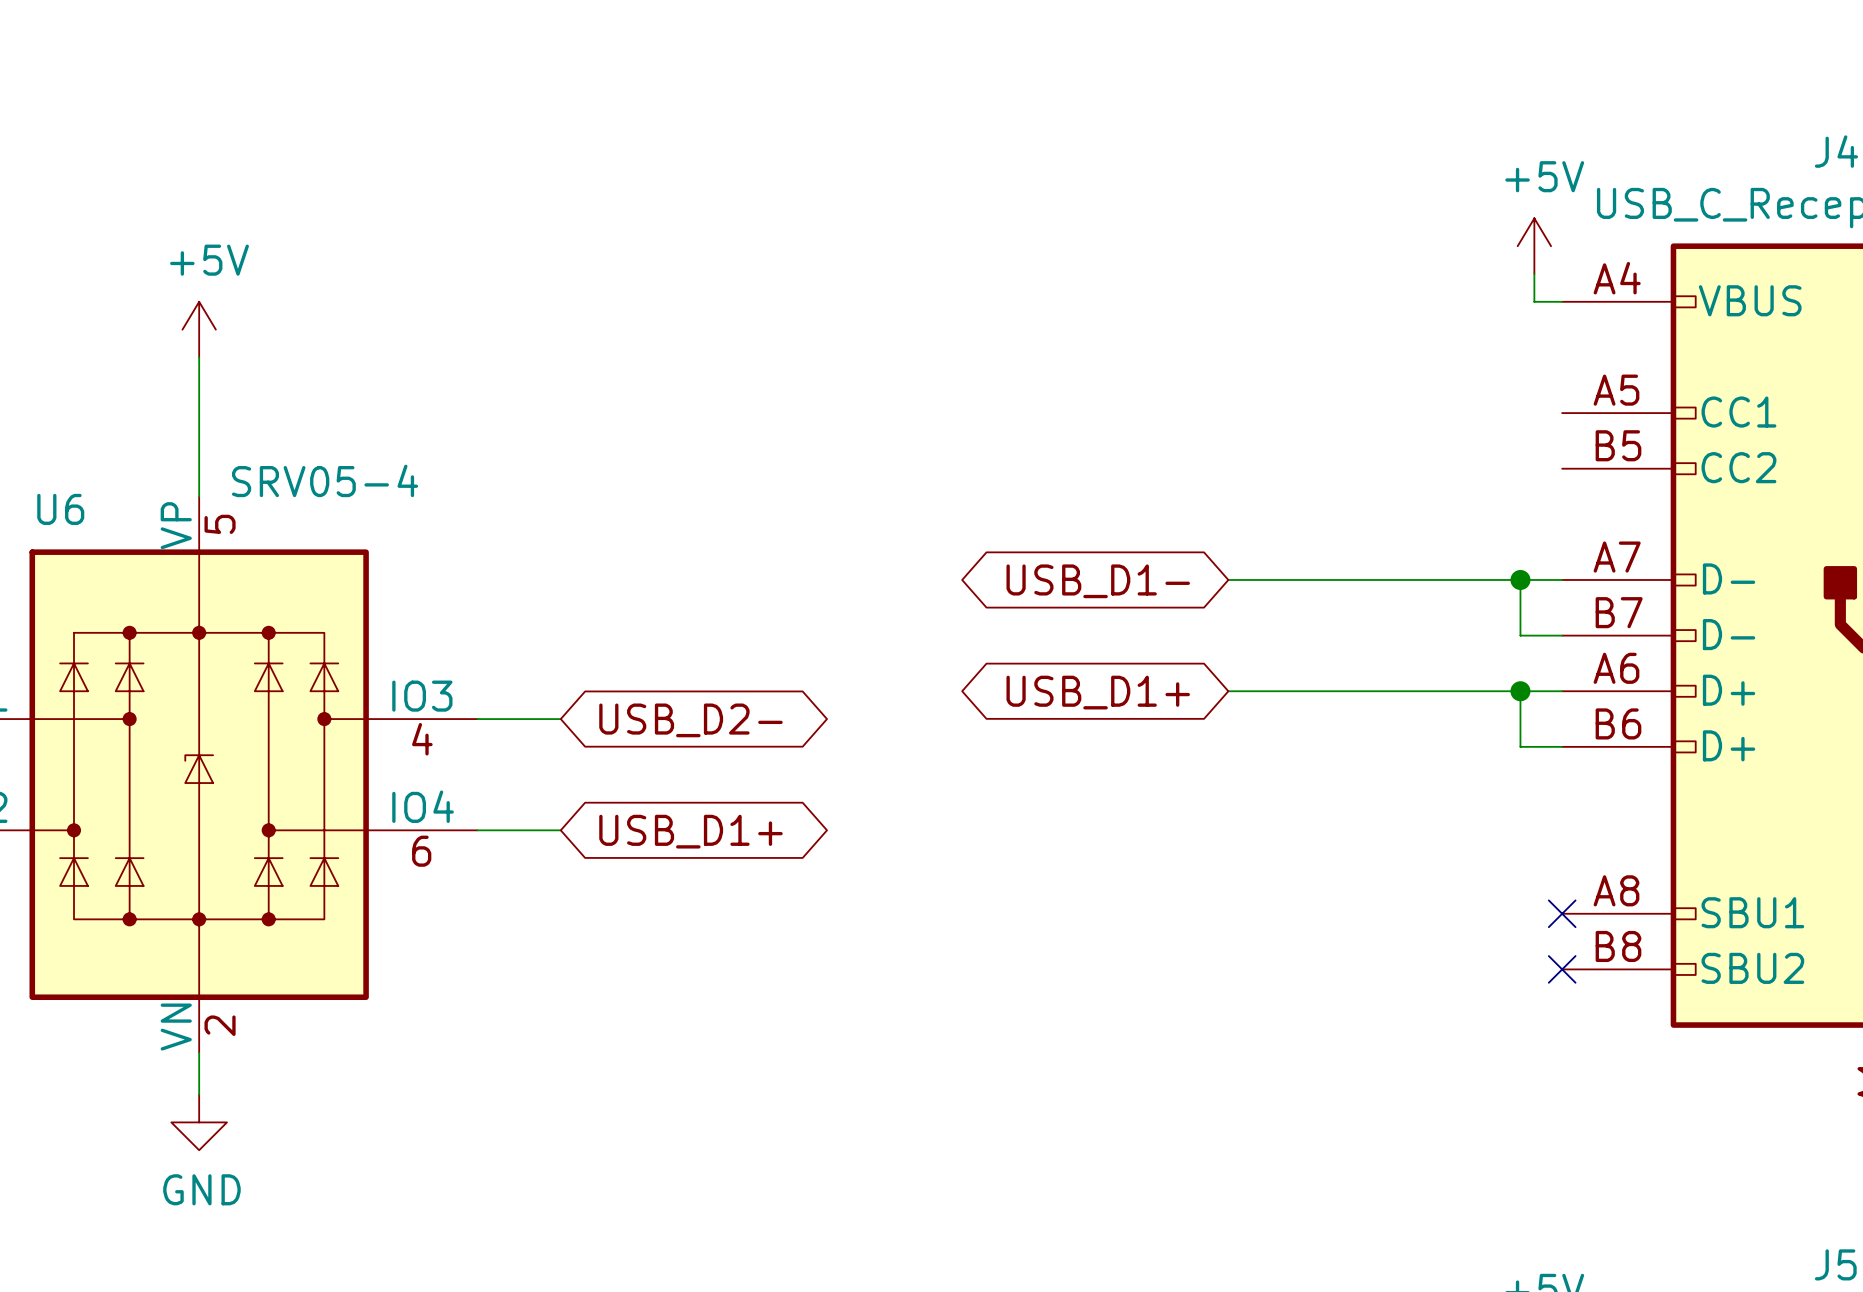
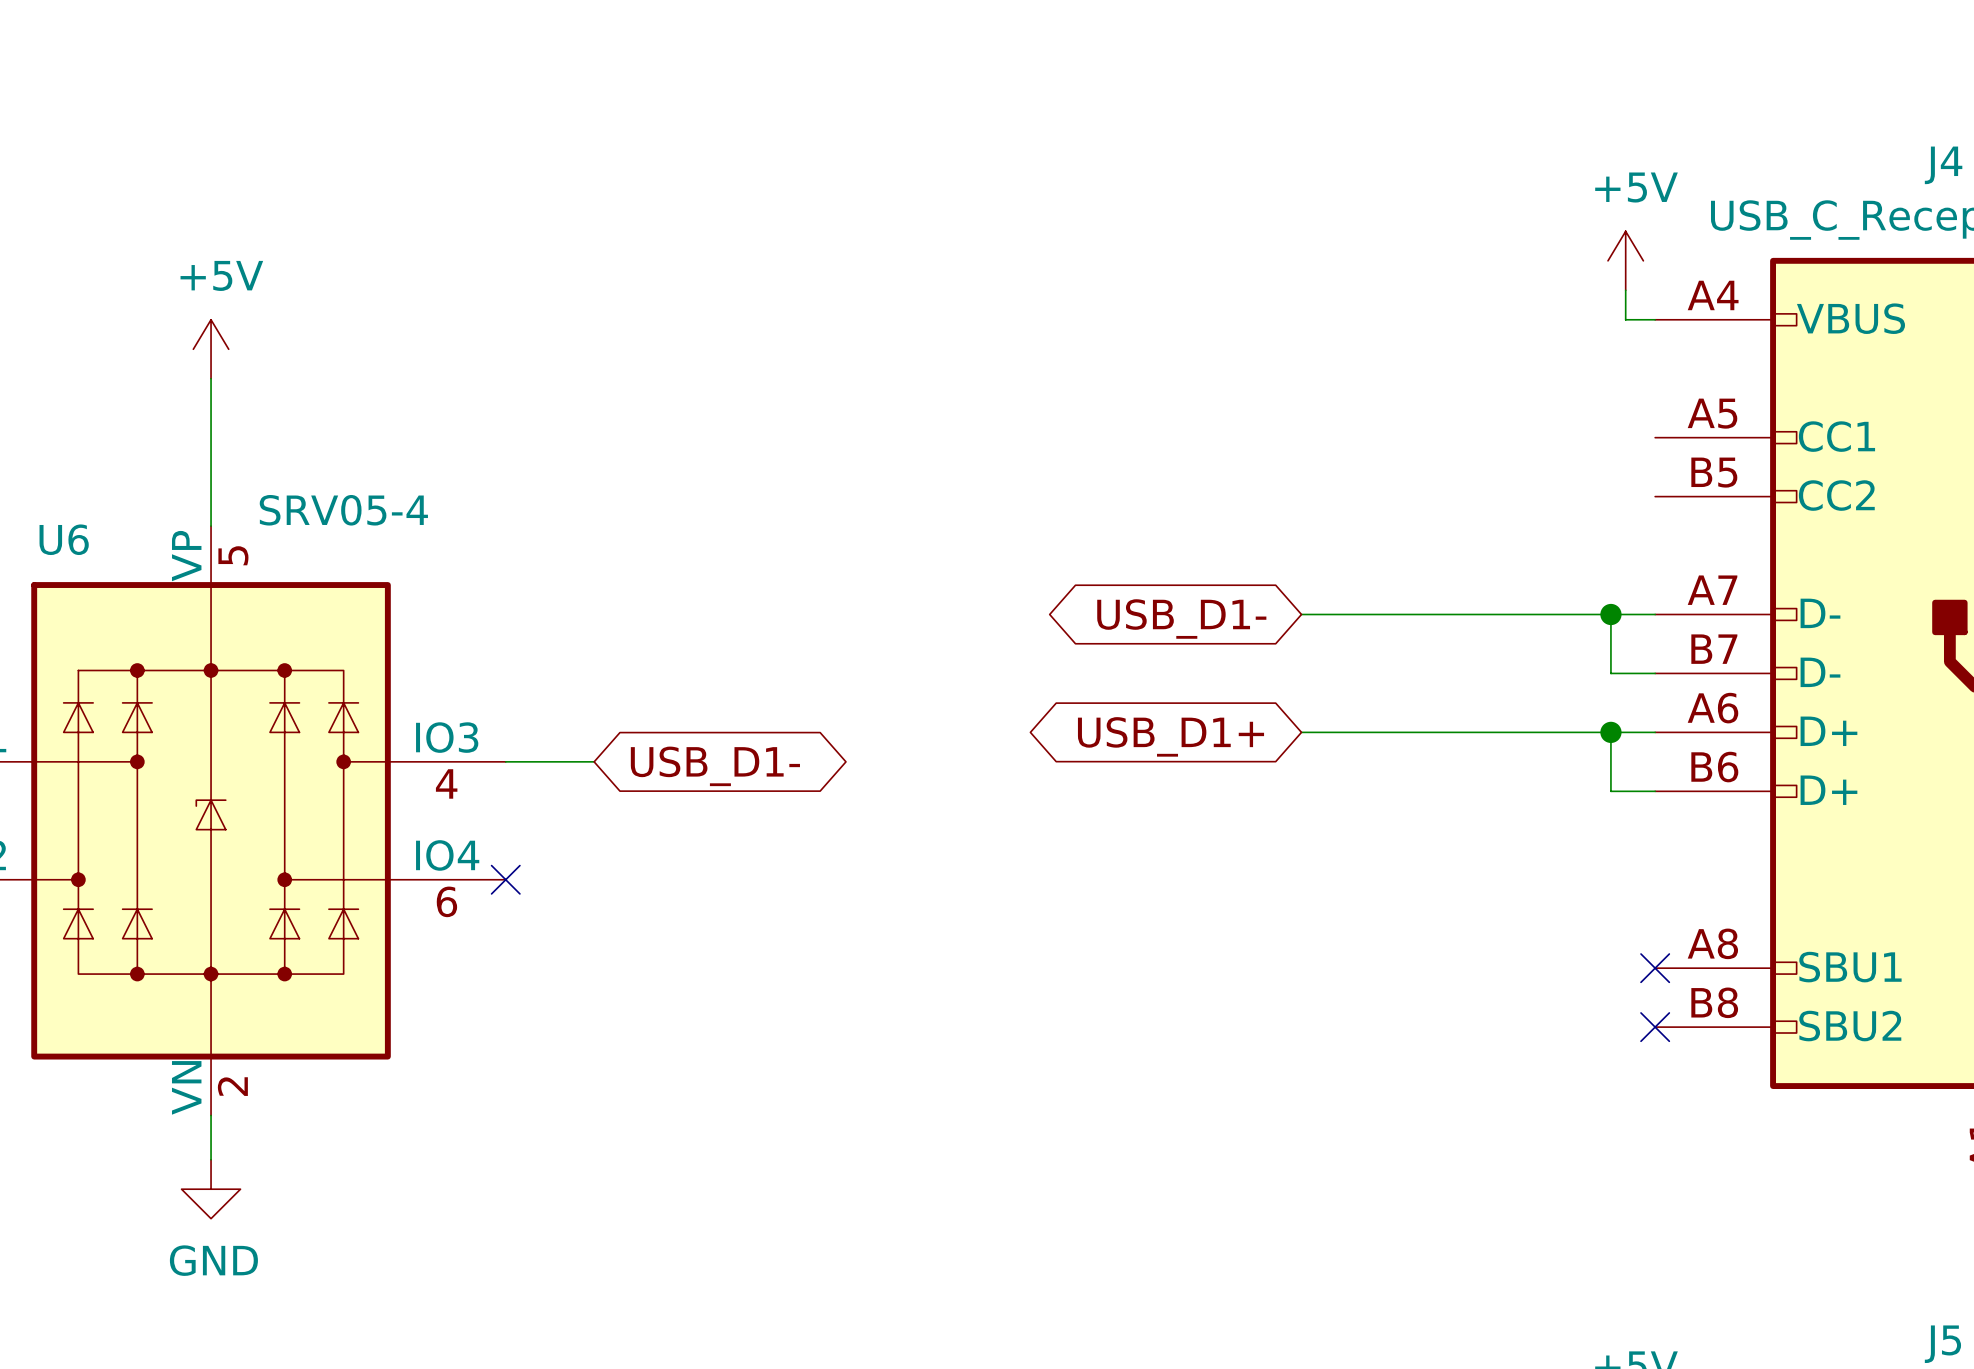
global label: USB_D2- (690, 720) -> USB_D1- (715, 766)
wire: (477, 830) (560, 830) -> none
no-connect mark: none -> (505, 879)
global label: USB_D1+ (690, 831) -> none

